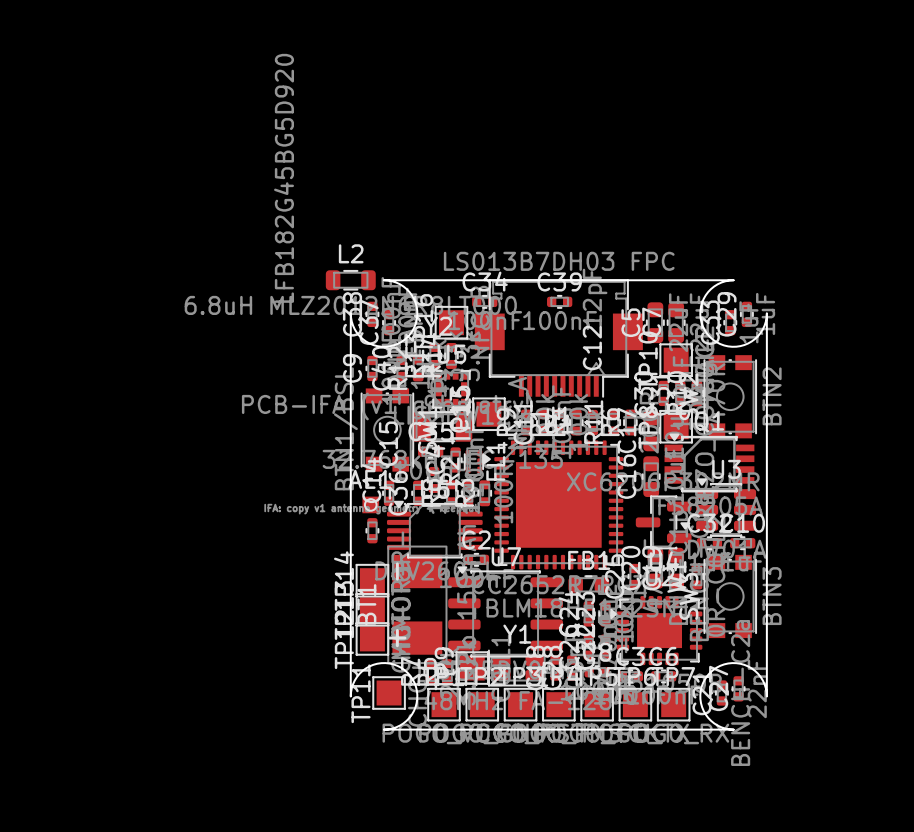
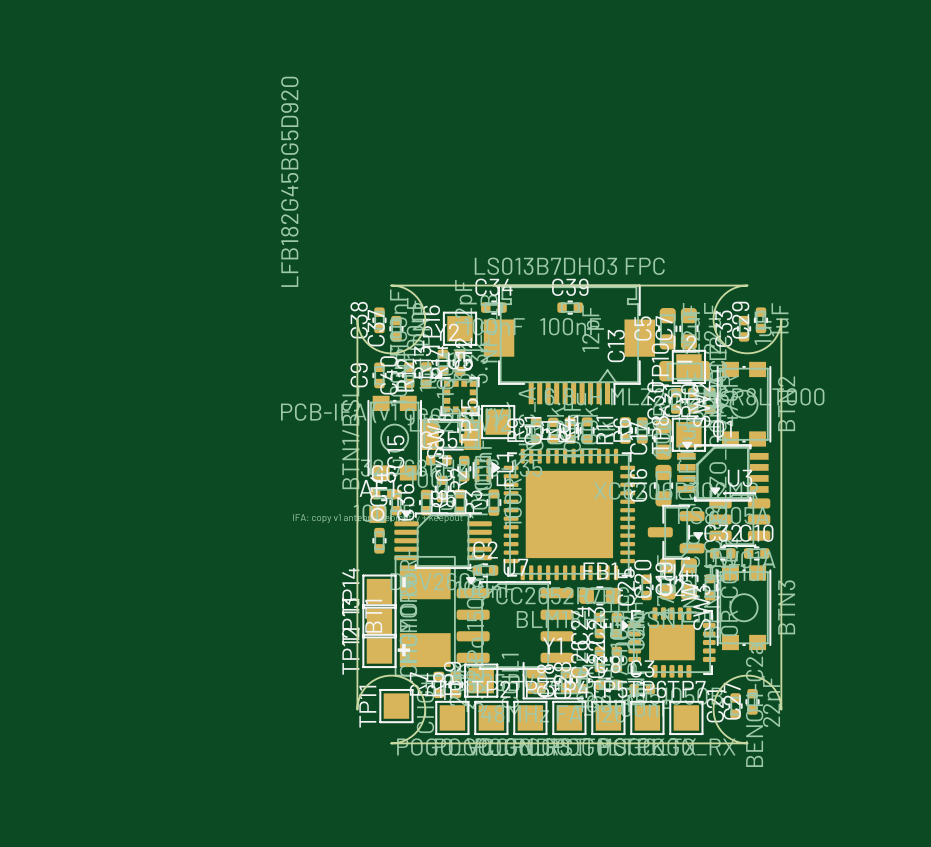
L2 position: (350, 280) -> (684, 371)
C12 position: (592, 422) -> (464, 430)
C13 position: (468, 493) -> (625, 430)
Y1 position: (518, 668) -> (553, 680)
C6 position: (663, 676) -> (383, 494)

